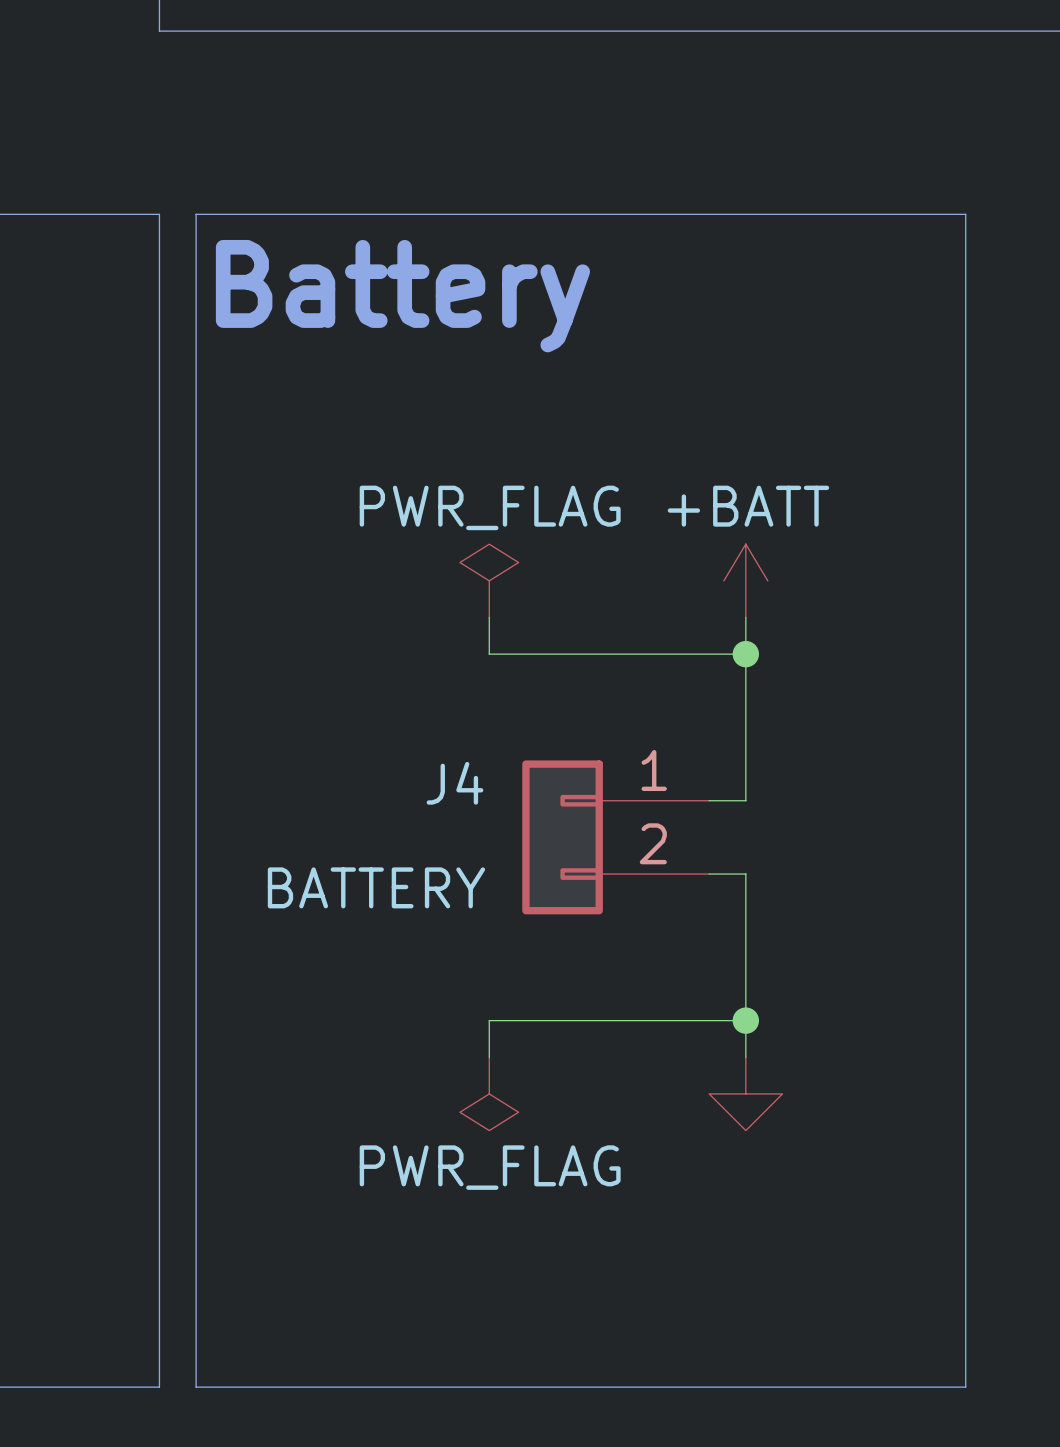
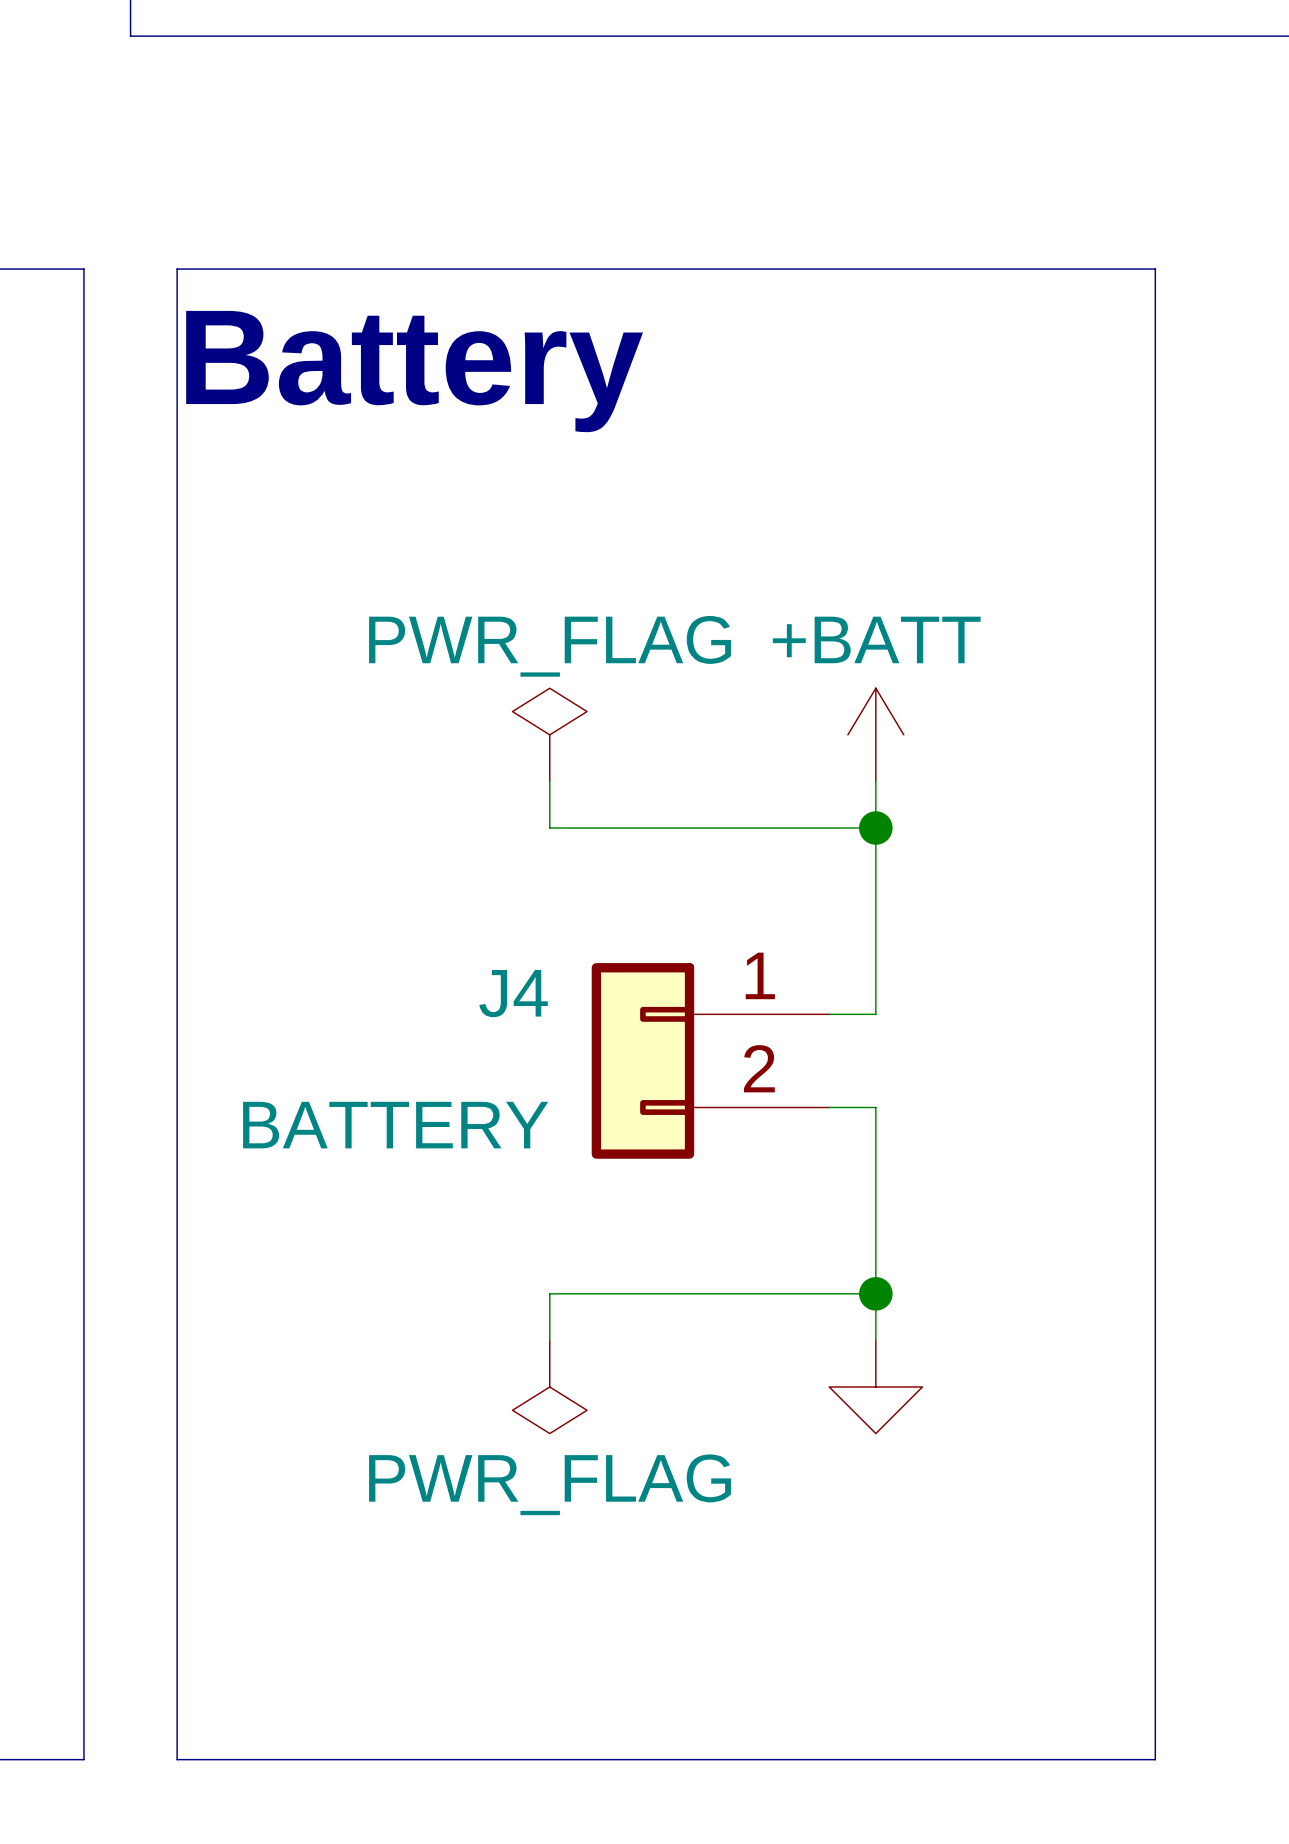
line: (122, 214) (159, 214) (159, 1387) (122, 1387) -> (83, 269) (83, 1759)

